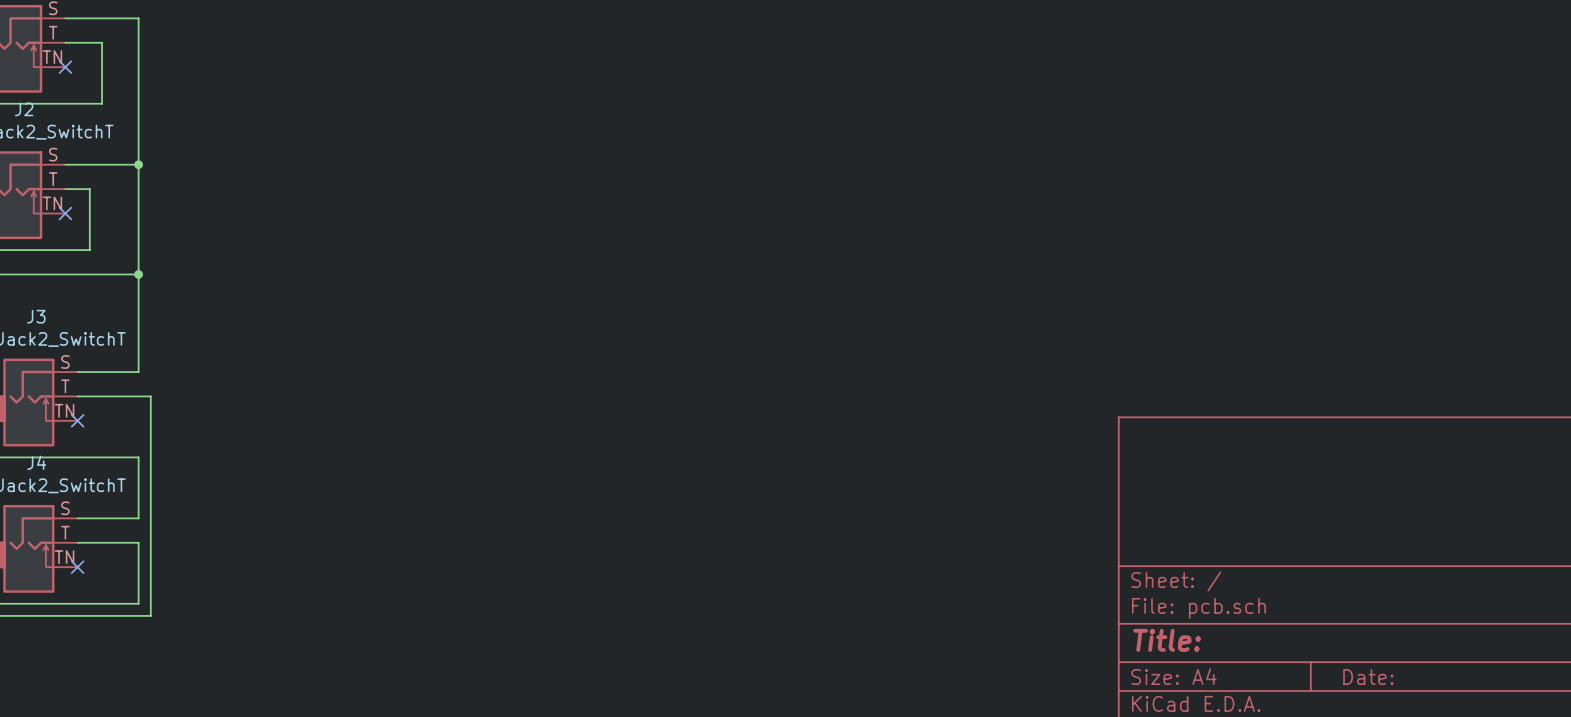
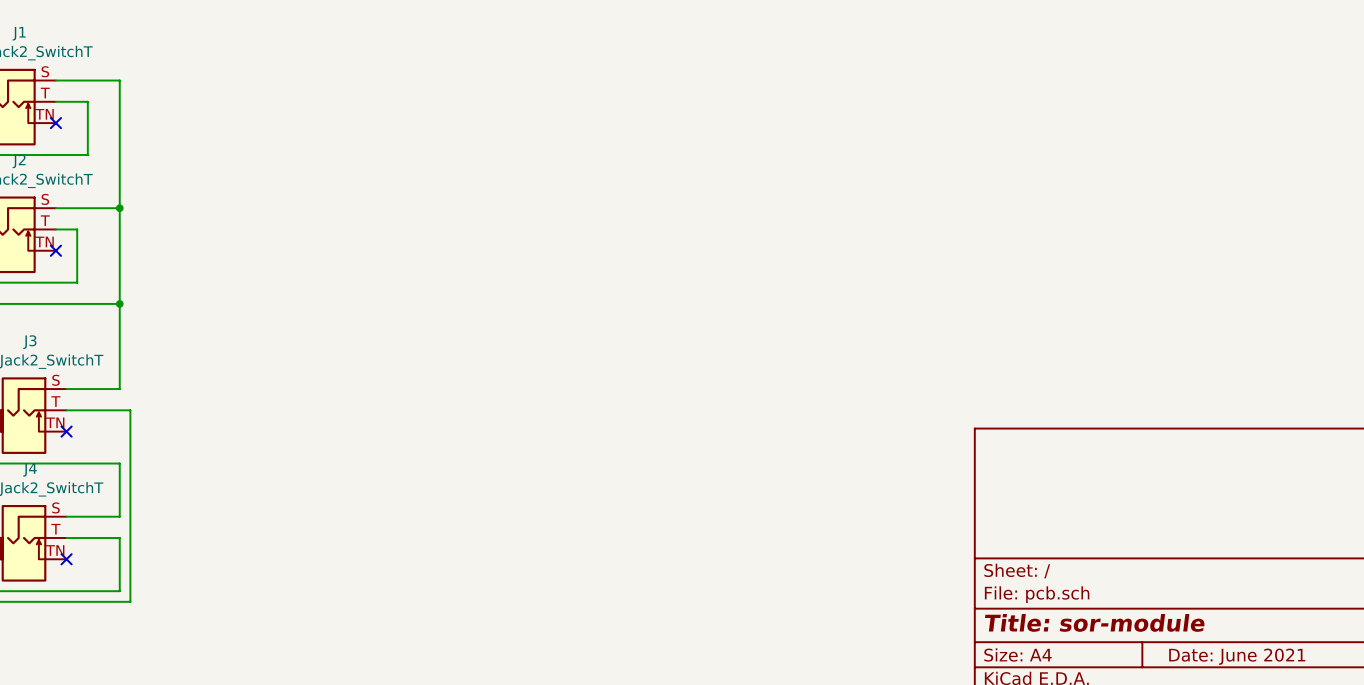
title block: Title: (1167, 640) -> Title: sor-module (1094, 622)
title block: Date: (1368, 677) -> Date: June 2021 (1237, 656)

